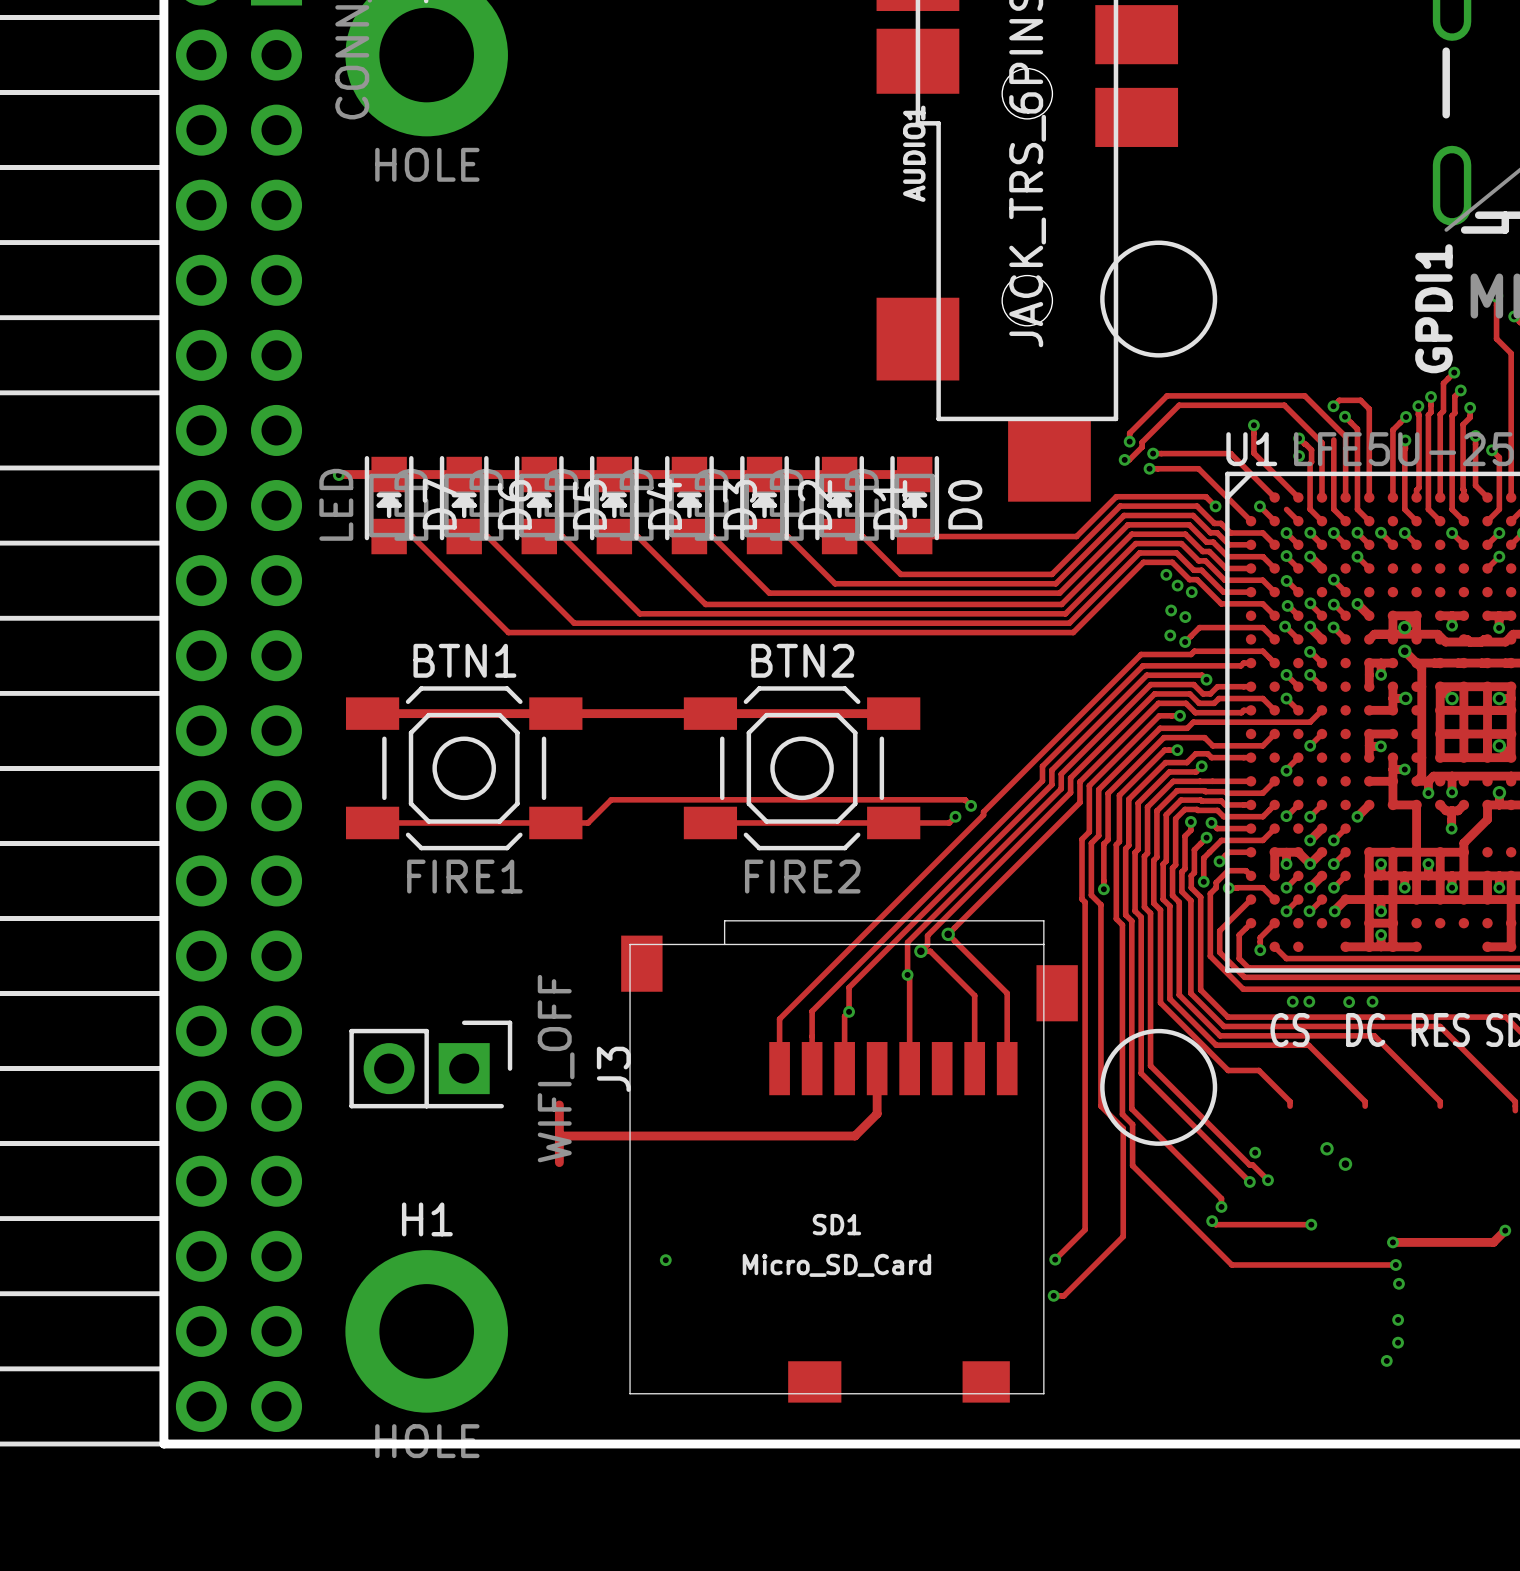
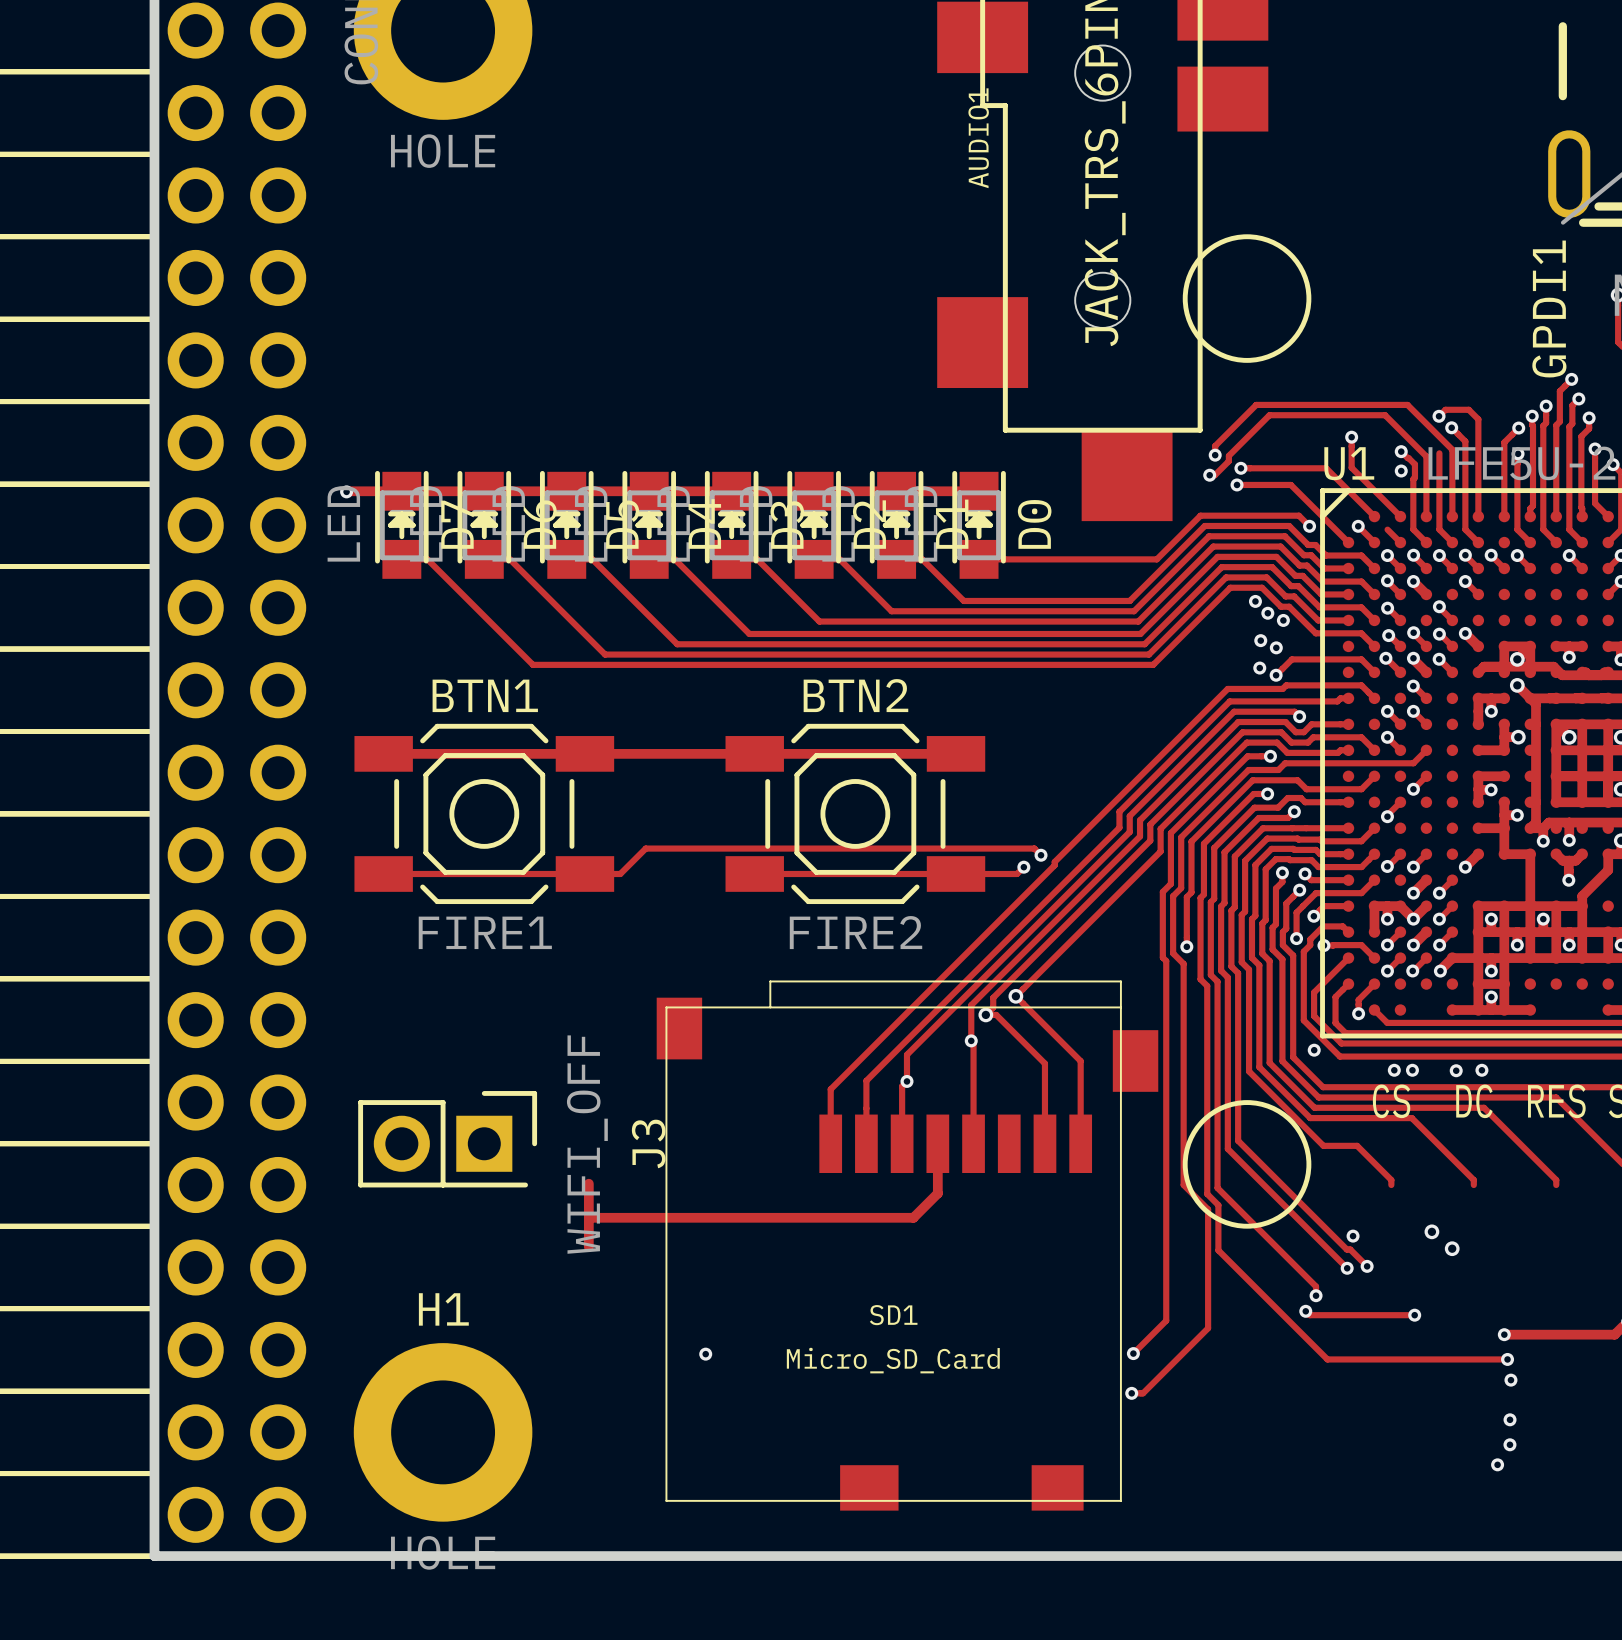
via: none -> (1314, 1050)

